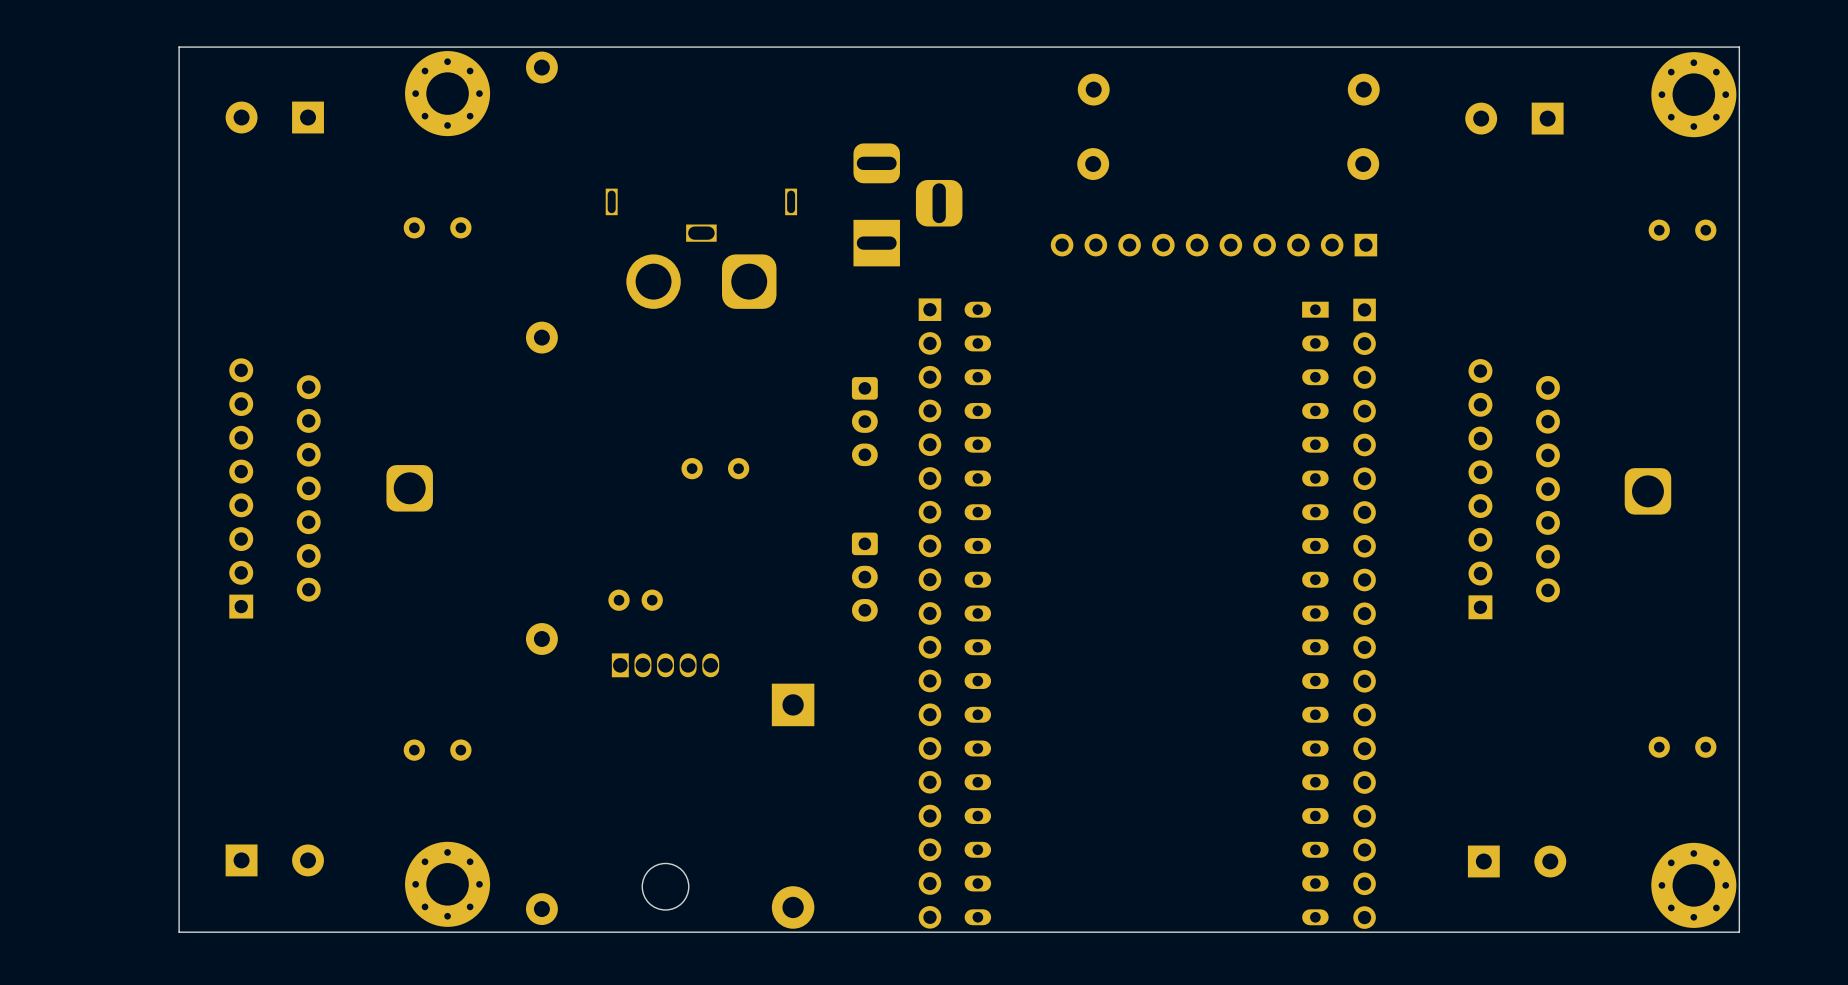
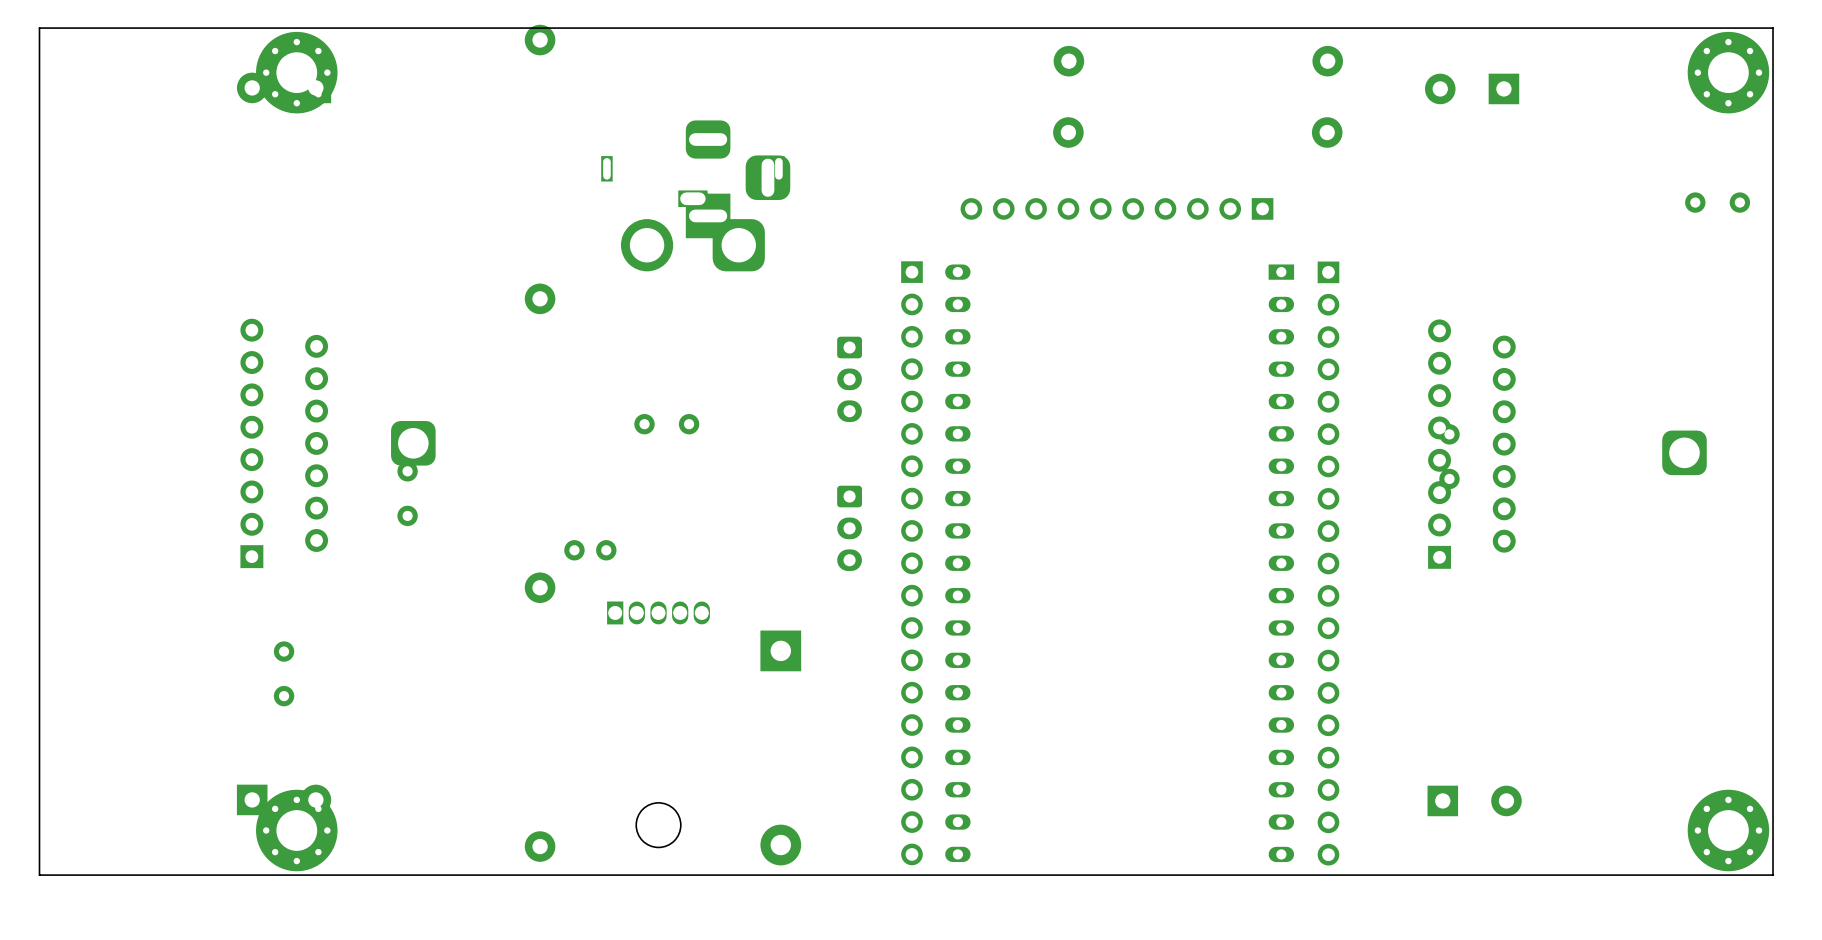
board edge: (1739, 47) (179, 47) (179, 932) (1739, 932) (1739, 47) -> (1773, 28) (1773, 875) (39, 875) (39, 28) (1773, 28)
part position: (447, 93) -> (296, 72)
part position: (1693, 94) -> (1728, 72)
part position: (907, 204) -> (738, 179)
part: (437, 227) -> none
part position: (1682, 230) -> (1717, 202)
part position: (1213, 245) -> (1116, 208)
part position: (715, 468) -> (666, 424)
part position: (1647, 491) -> (1684, 452)
part: none -> (1449, 456)
part: none -> (407, 493)
part position: (635, 600) -> (590, 550)
part: none -> (284, 673)
part: (1682, 747) -> none
part: (437, 750) -> none
part position: (447, 884) -> (296, 830)
part position: (1693, 885) -> (1728, 830)

